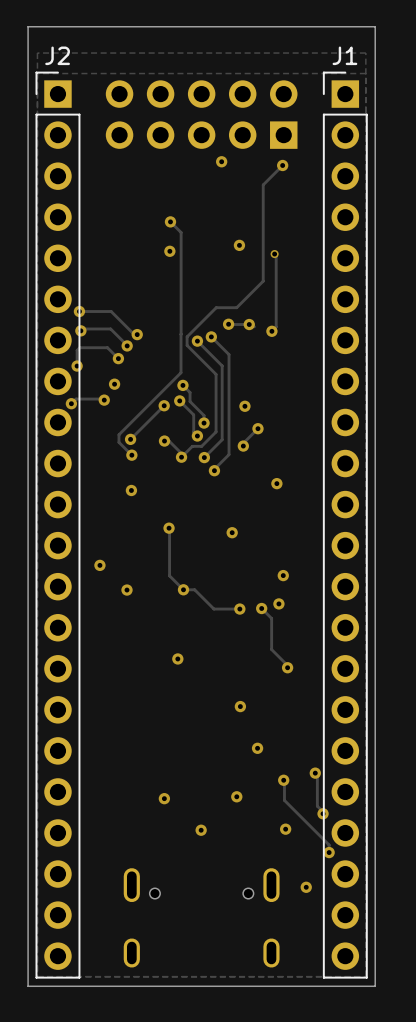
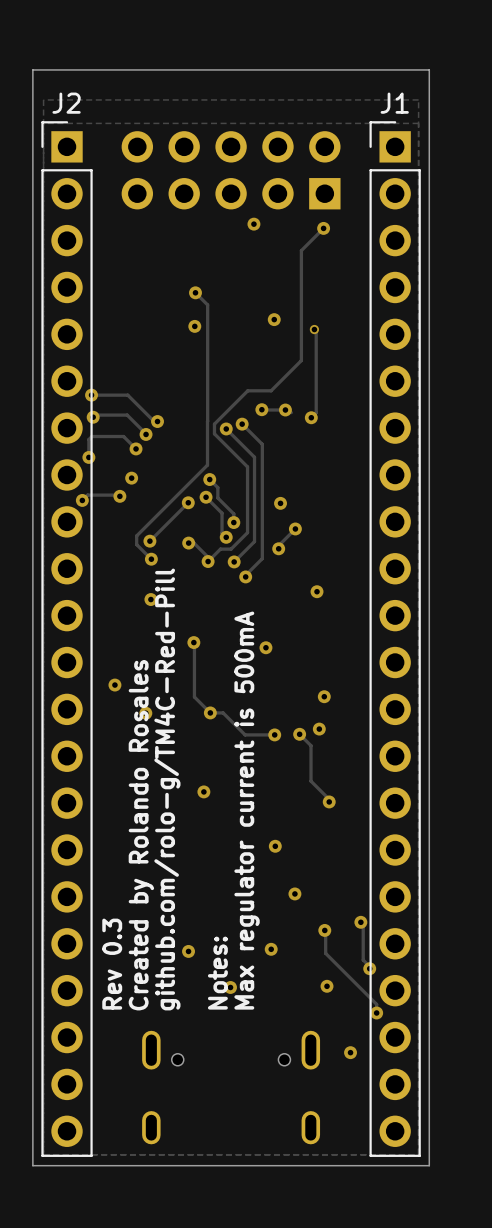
text: none -> github.com/rolo-g/TM4C-Red-Pill (167, 789)
text: none -> Max regulator current is 500mA (247, 810)
text: none -> Created by Rolando Rosales (141, 835)
text: none -> Rev 0.3 (112, 964)
text: none -> Notes: (217, 973)

